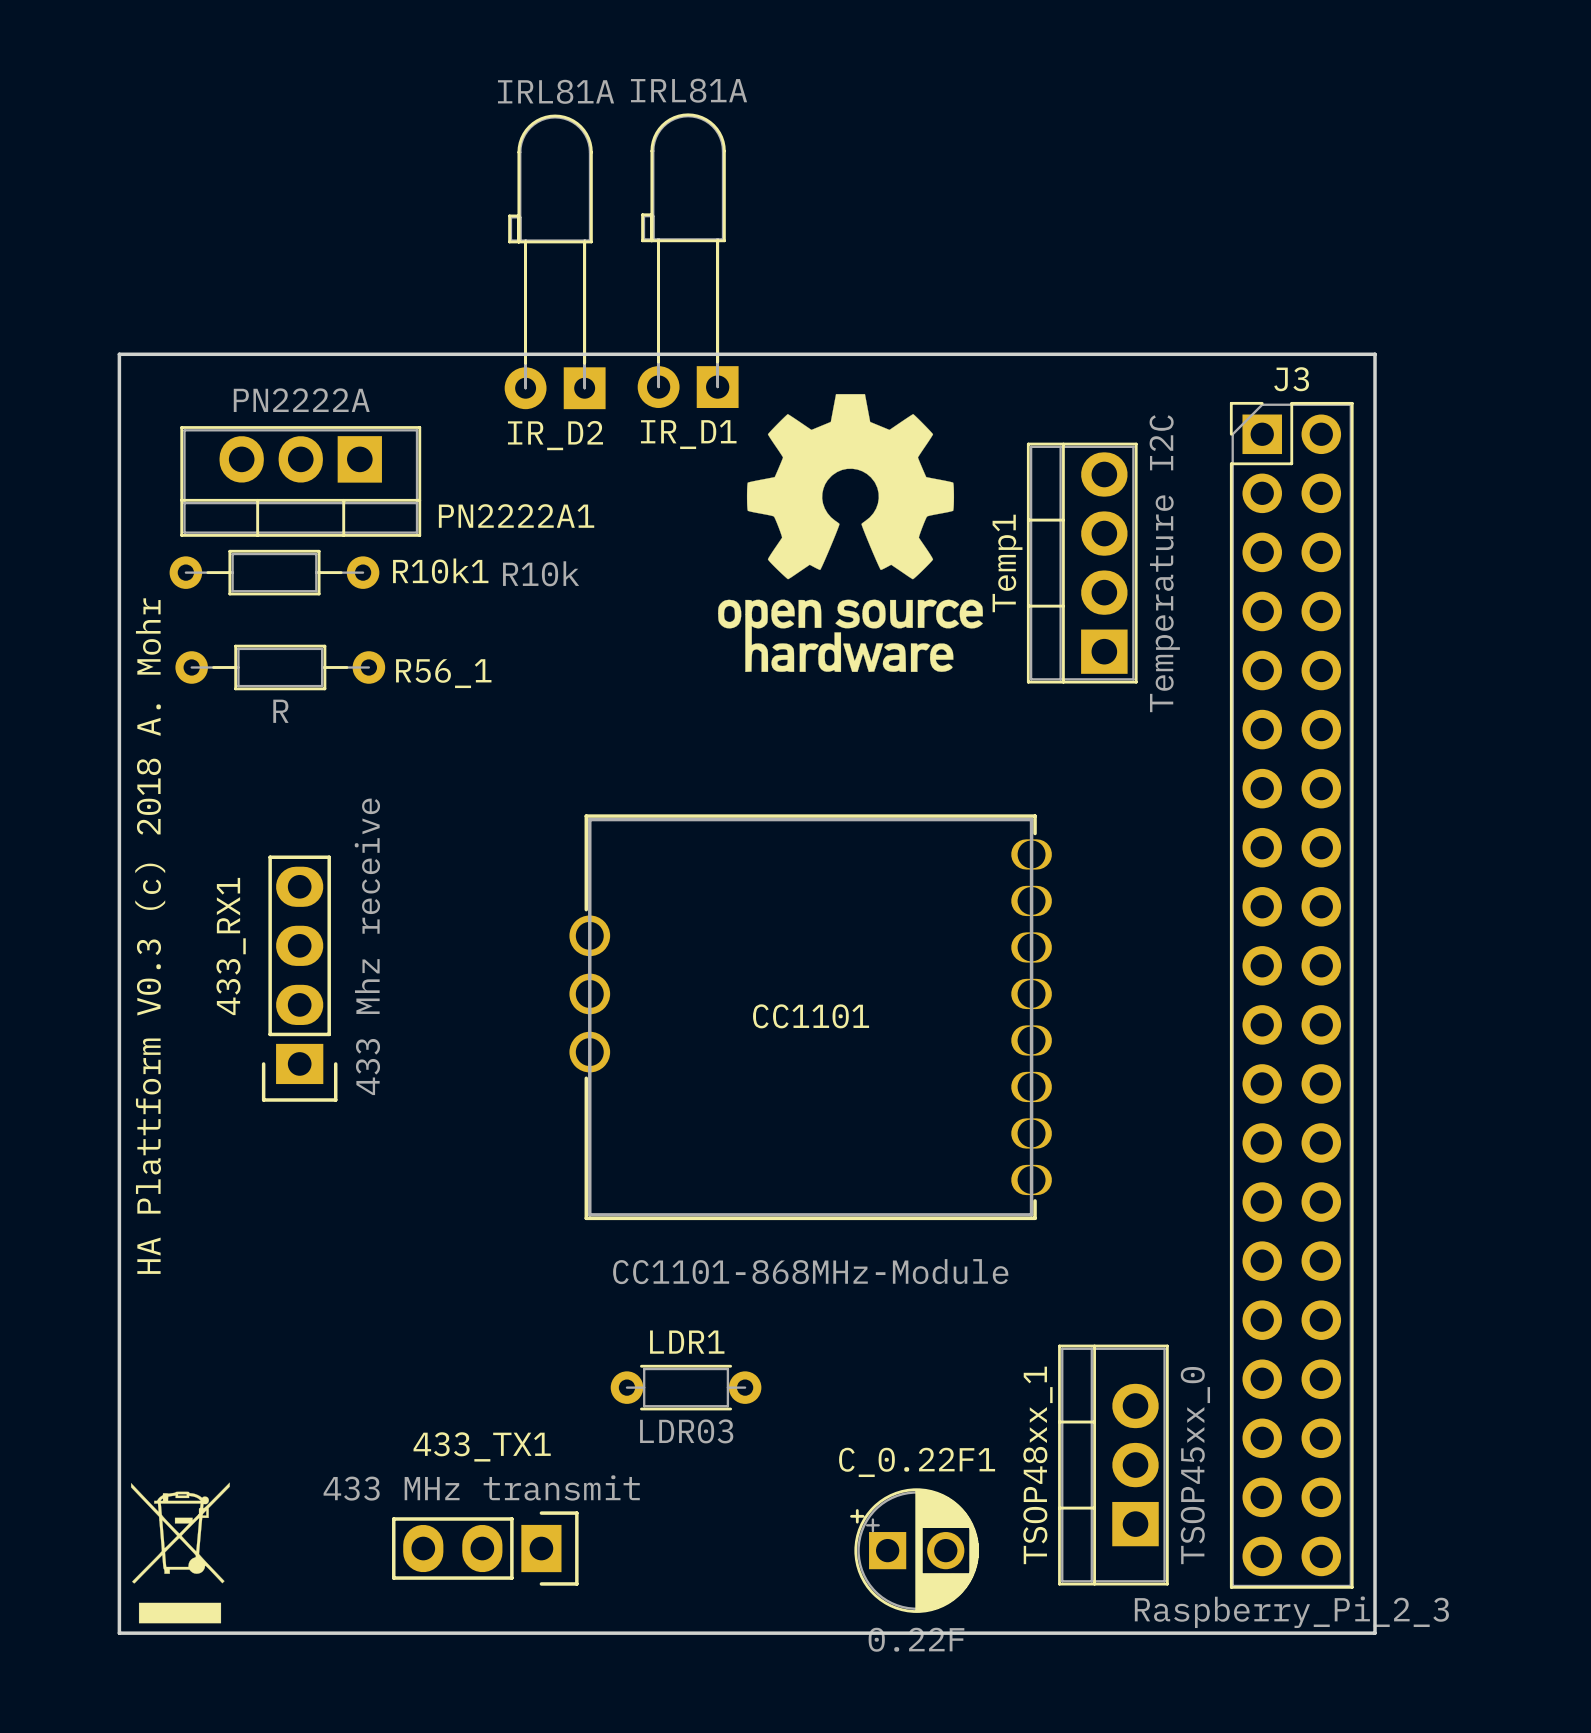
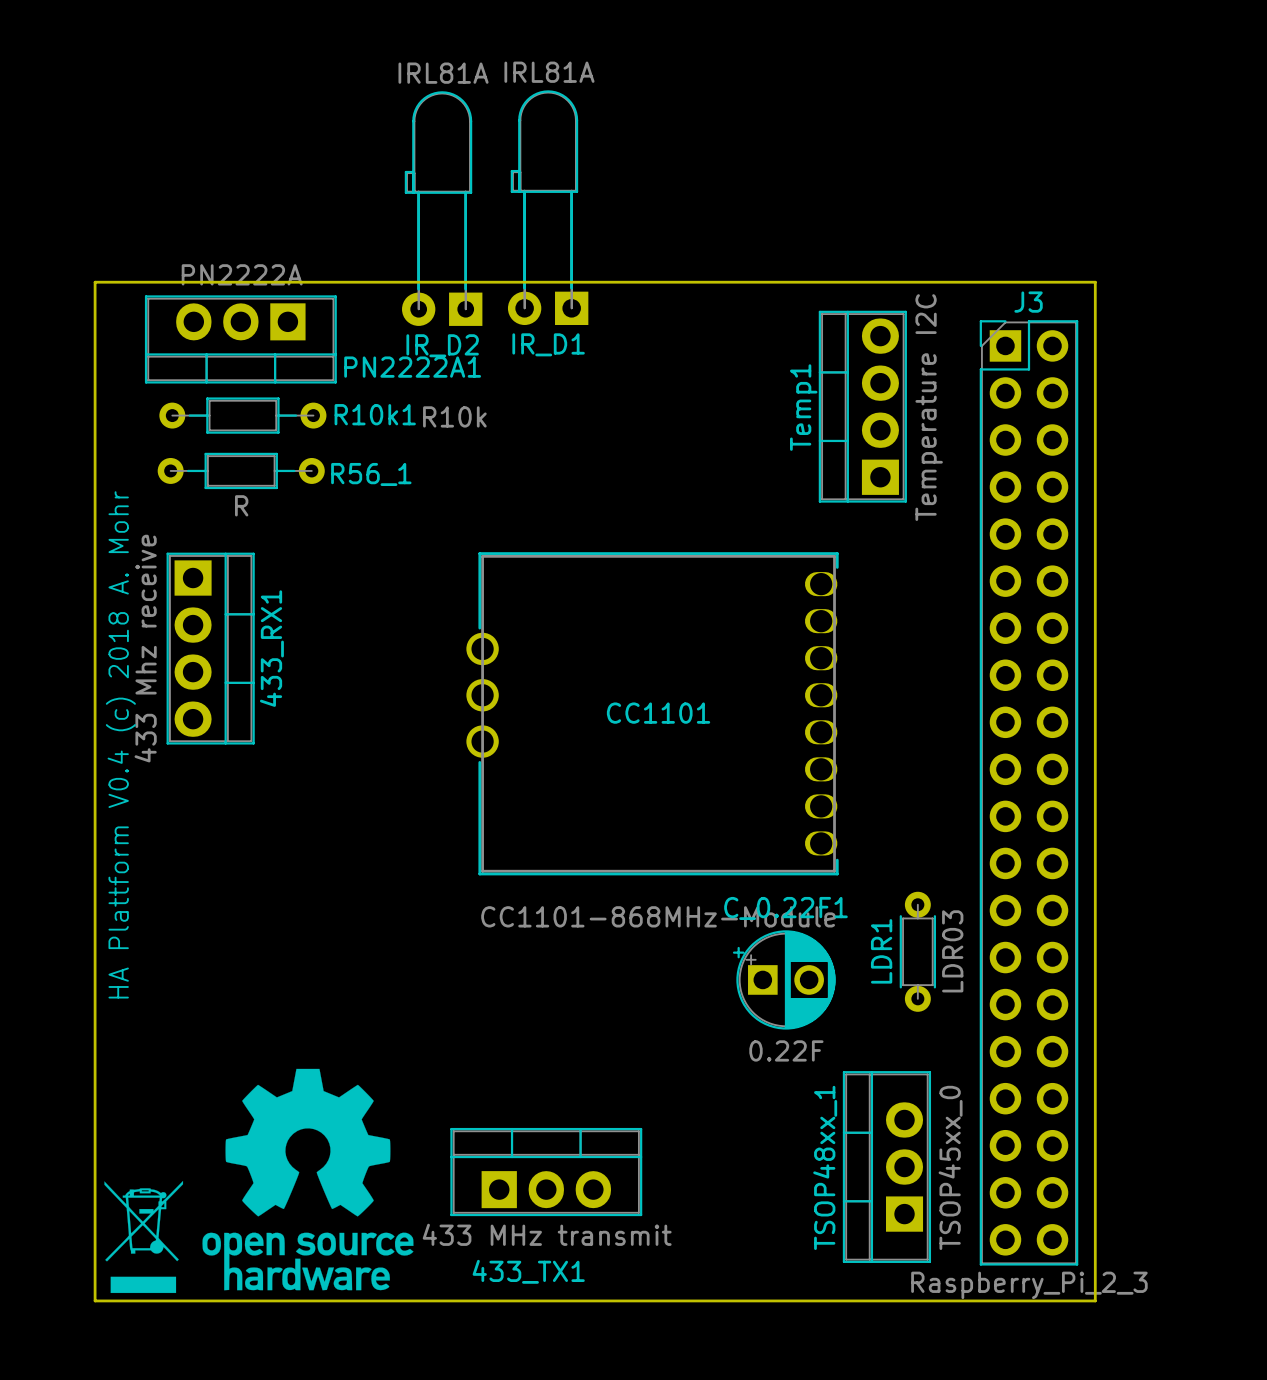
drawing: [718, 394, 983, 673] -> none
PN2222A1 position: (300, 481) -> (240, 339)
Temp1 position: (1082, 563) -> (862, 406)
R10k1 position: (274, 572) -> (242, 415)
R56_1 position: (280, 667) -> (241, 470)
CC1101 footprint: [569, 814, 1052, 1221] -> [466, 552, 839, 876]
433_RX1 footprint: [261, 855, 338, 1102] -> [166, 552, 255, 745]
text: HA Plattform V0.3 (c) 2018 A. Mohr (150, 936) -> HA Plattform V0.4 (c) 2018 A. Mohr (120, 744)
433_RX1 name position: 433_RX1 (231, 946) -> 433_RX1 (271, 648)
433_RX1 value position: 433 Mhz receive (367, 946) -> 433 Mhz receive (145, 648)
drawing: none -> [202, 1068, 414, 1291]
LDR1 name position: LDR1 (687, 1342) -> LDR1 (881, 951)
LDR1 rotation: 0° (686, 1387) -> 90° clockwise (917, 951)
LDR1 position: (686, 1387) -> (917, 951)
LDR1 value position: LDR03 (686, 1431) -> LDR03 (952, 951)
433_TX1 name position: 433_TX1 (482, 1446) -> 433_TX1 (528, 1271)
433_TX1 value position: 433 MHz transmit (481, 1487) -> 433 MHz transmit (547, 1234)
433_TX1 footprint: [392, 1511, 579, 1586] -> [450, 1127, 643, 1217]
C_0.22F1 position: (914, 1550) -> (784, 979)

